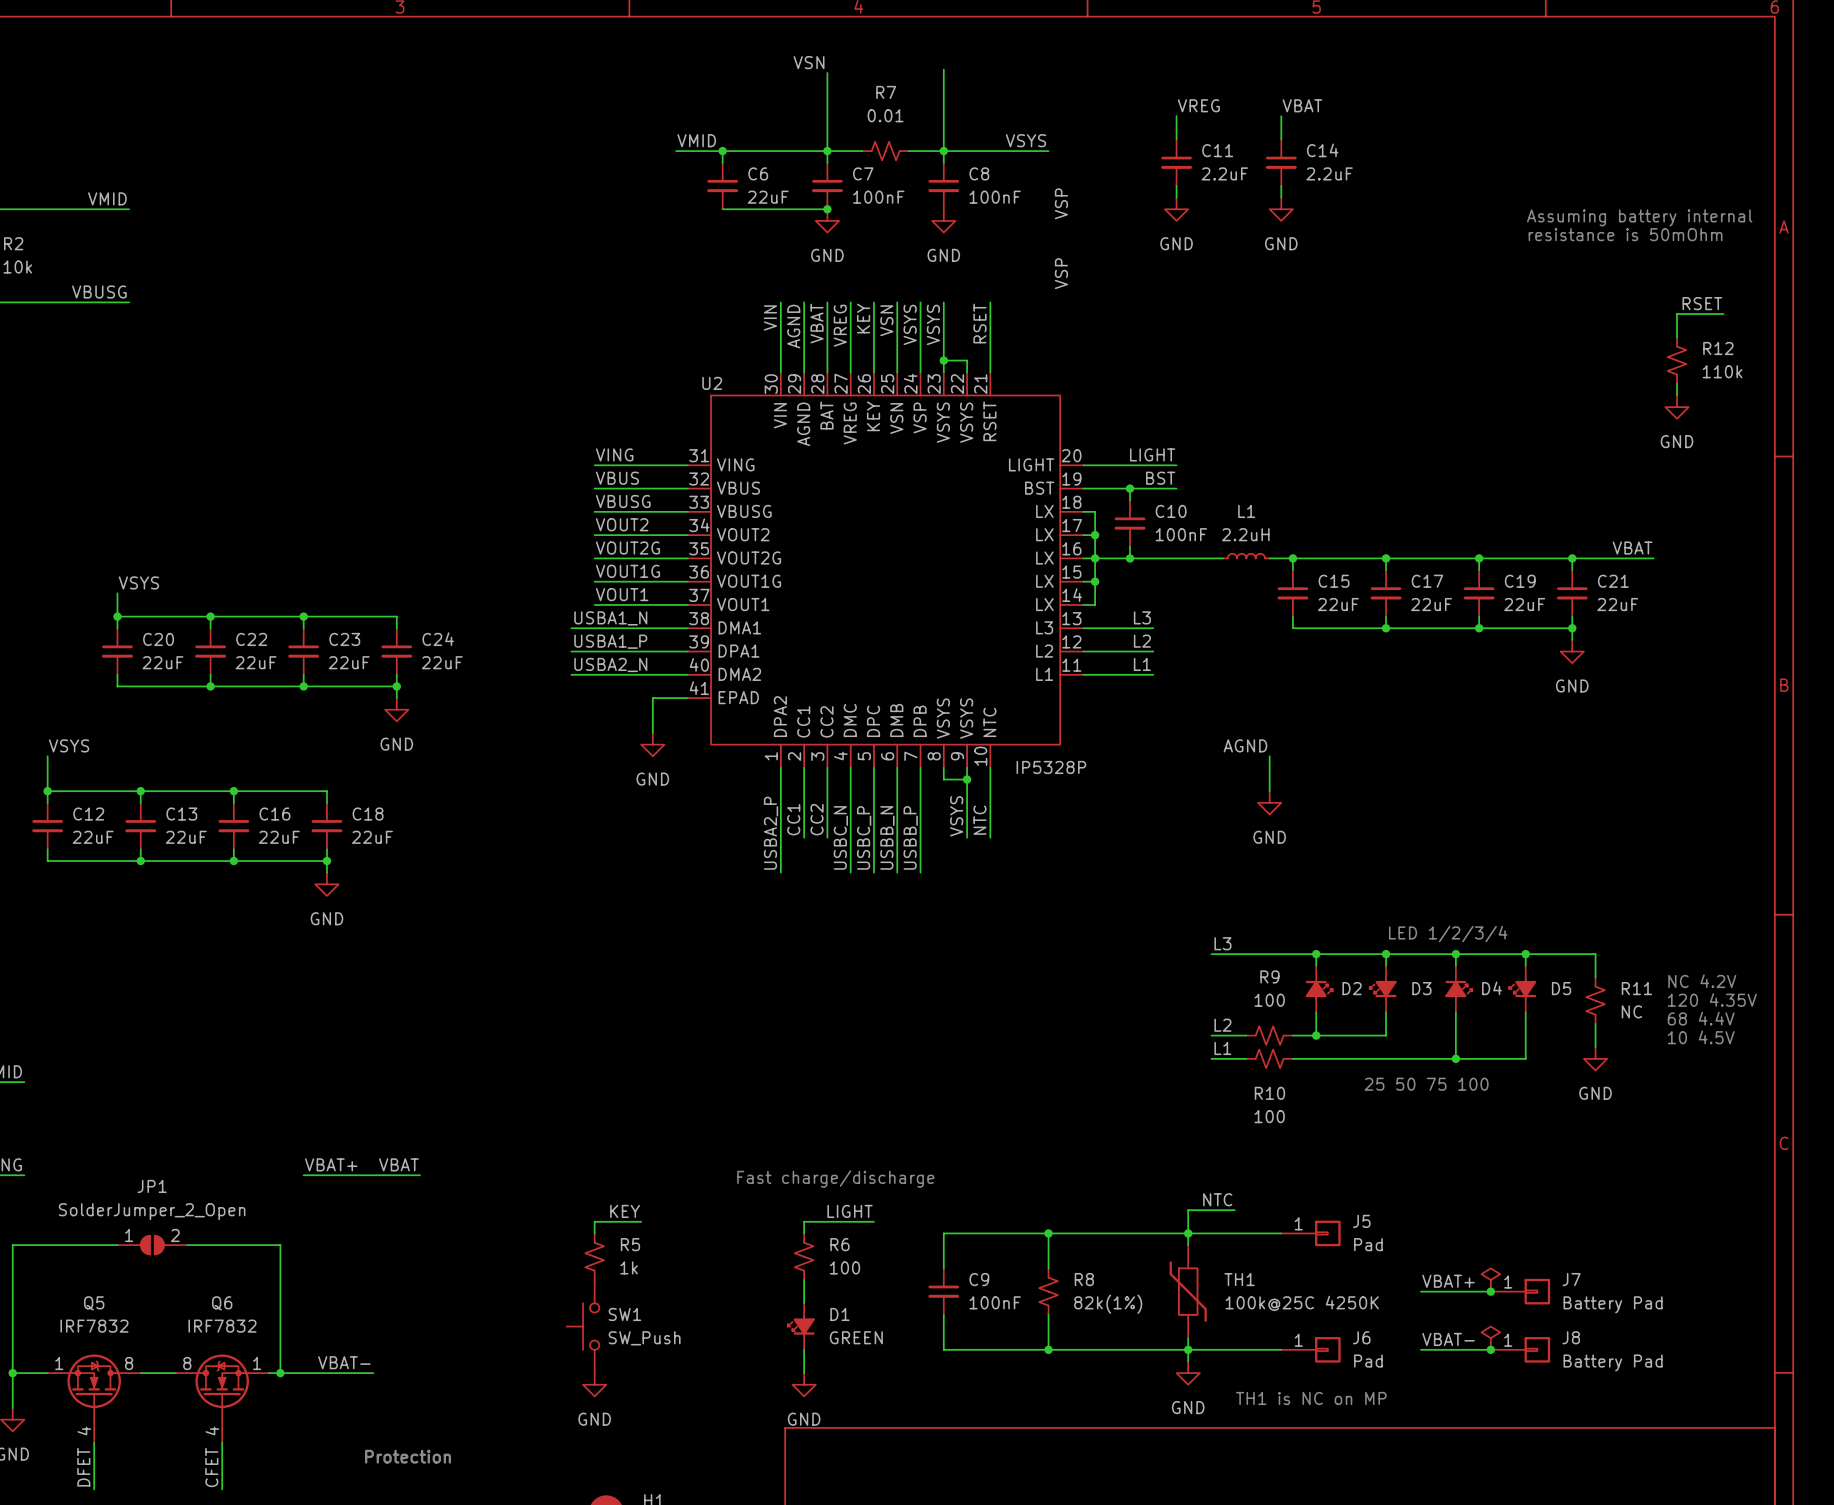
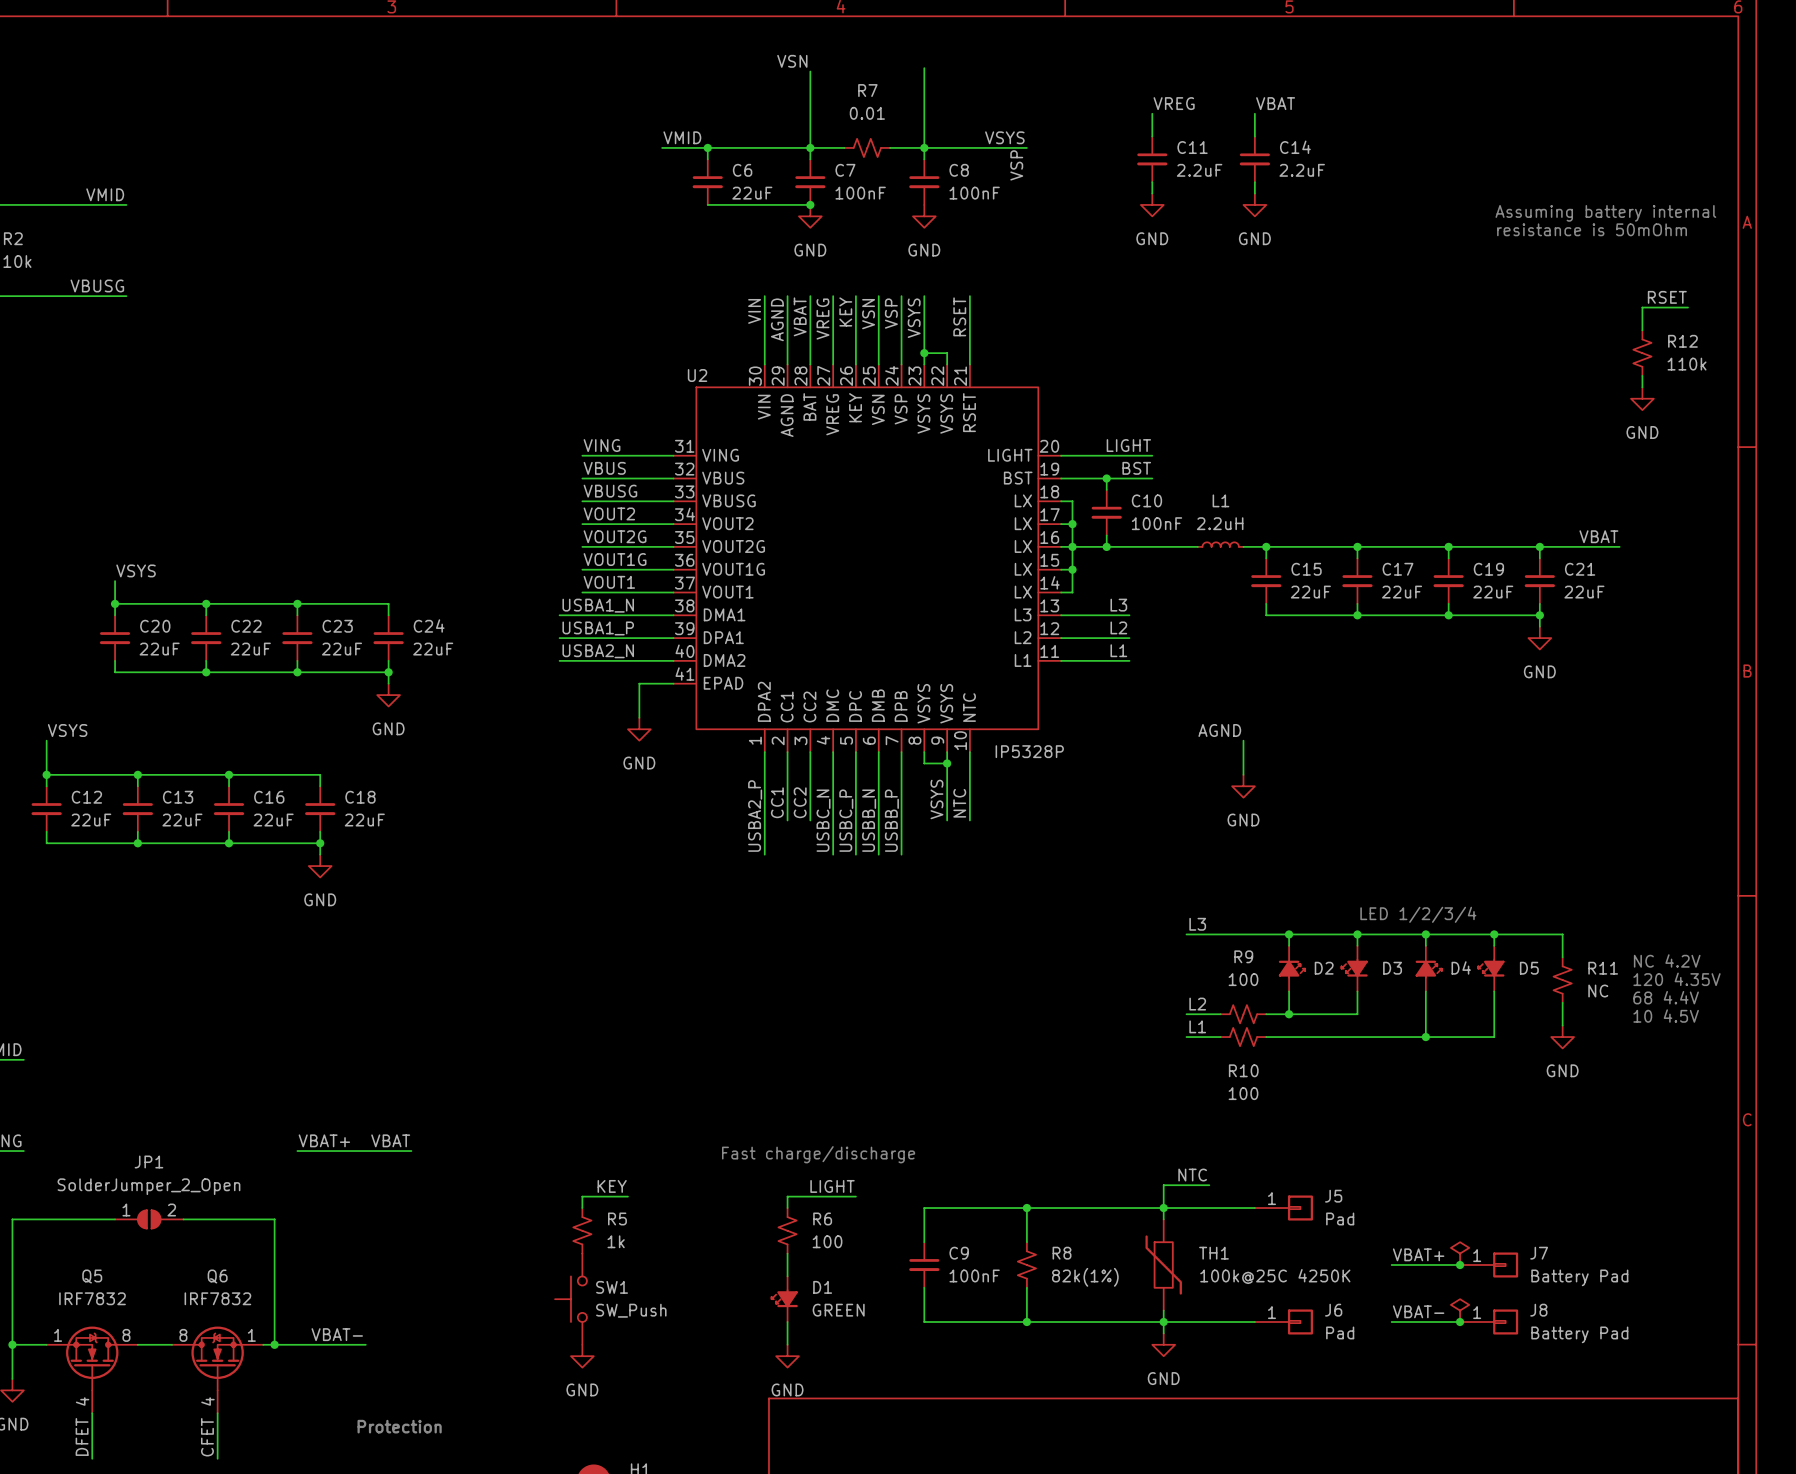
label position: VSP (1061, 203) -> VSP (1016, 165)
label: VSP (1061, 273) -> none
label: VSYS (910, 324) -> VSP (891, 313)
text: 25 50 75 100 (1426, 1084) -> none
text: TH1 is NC on MP (1311, 1398) -> none

